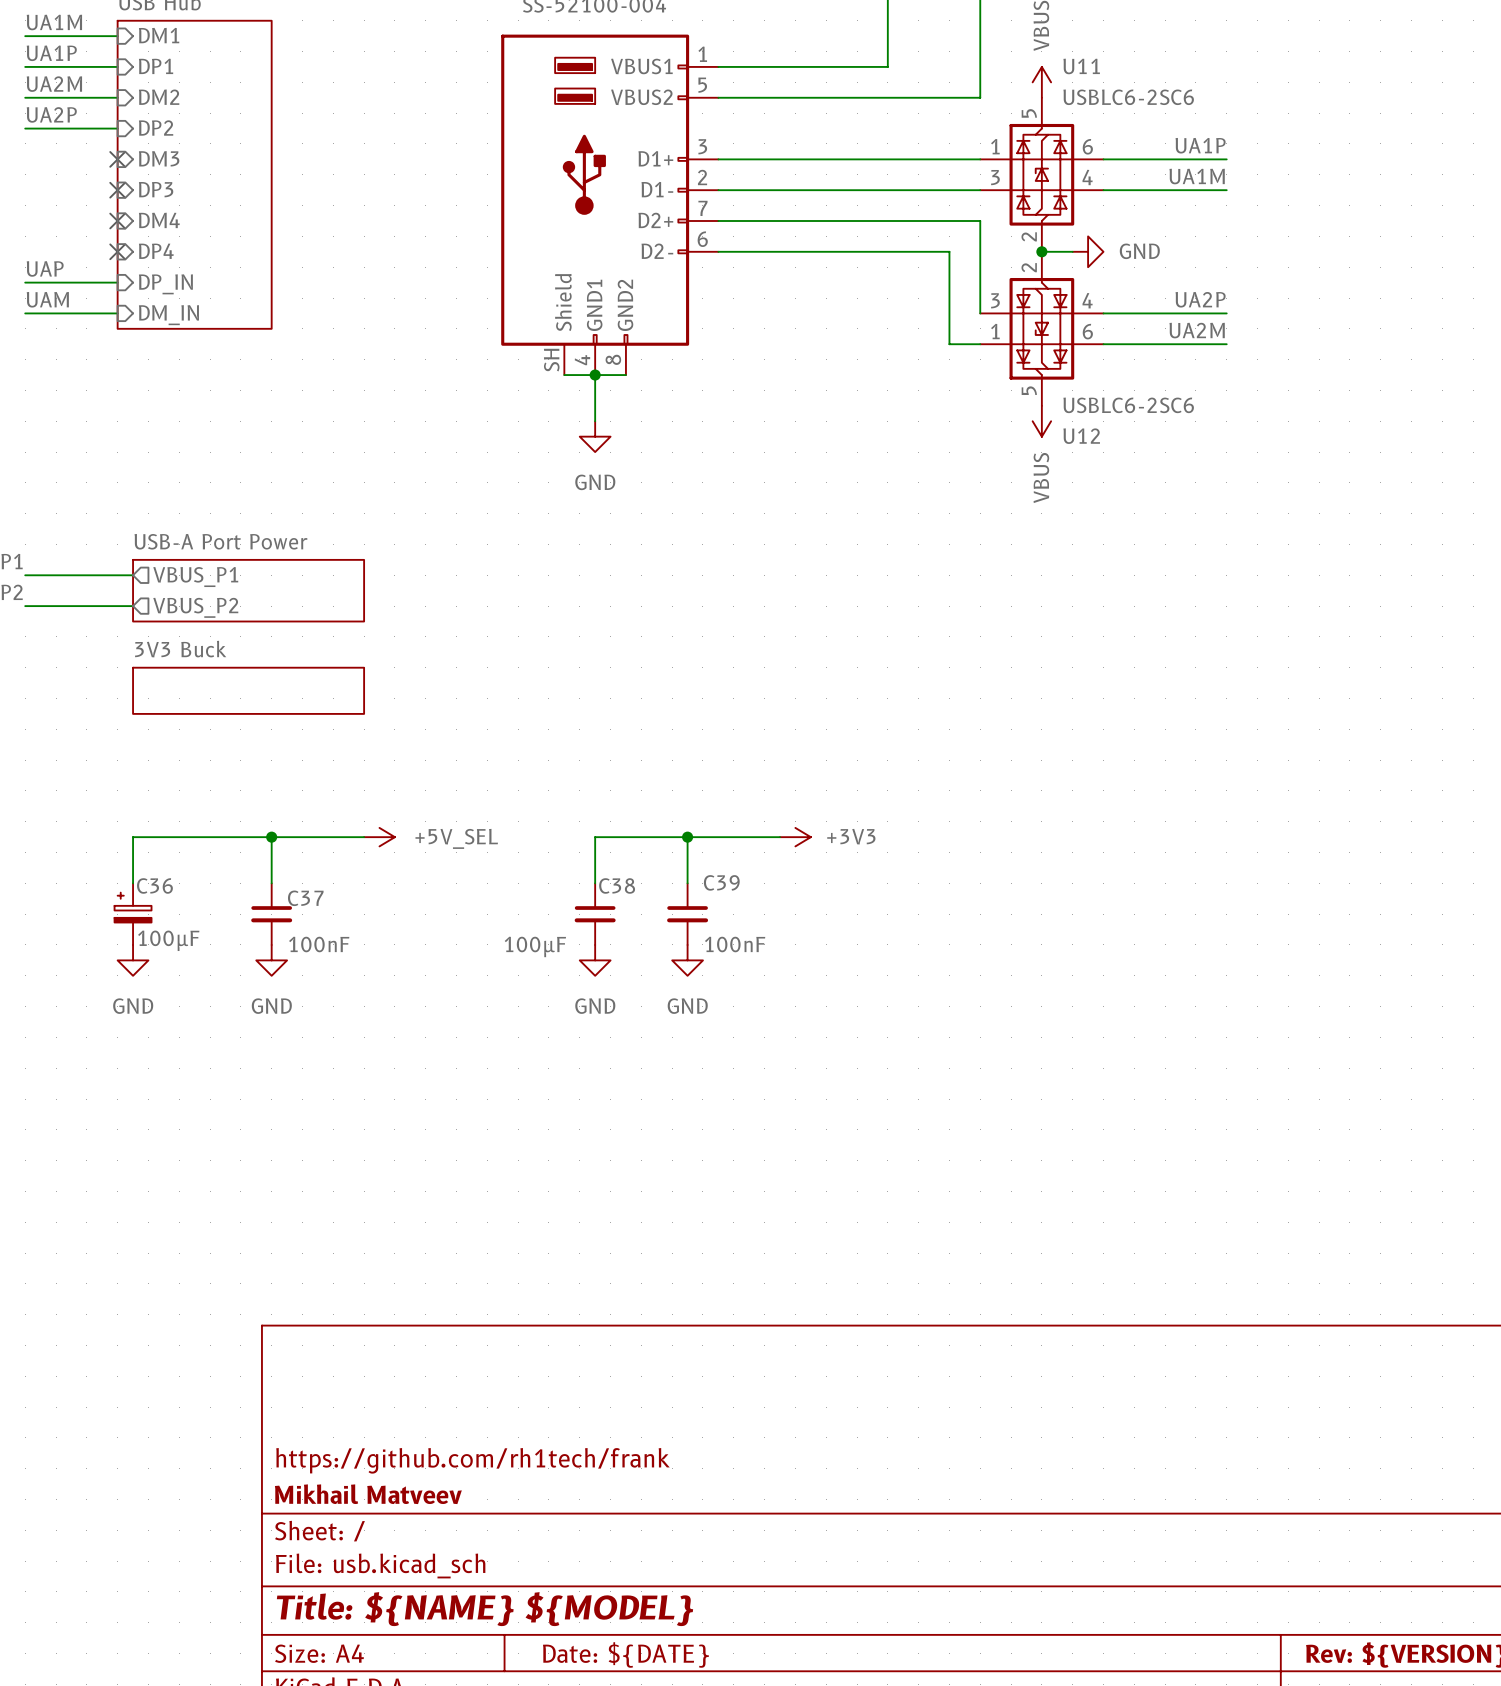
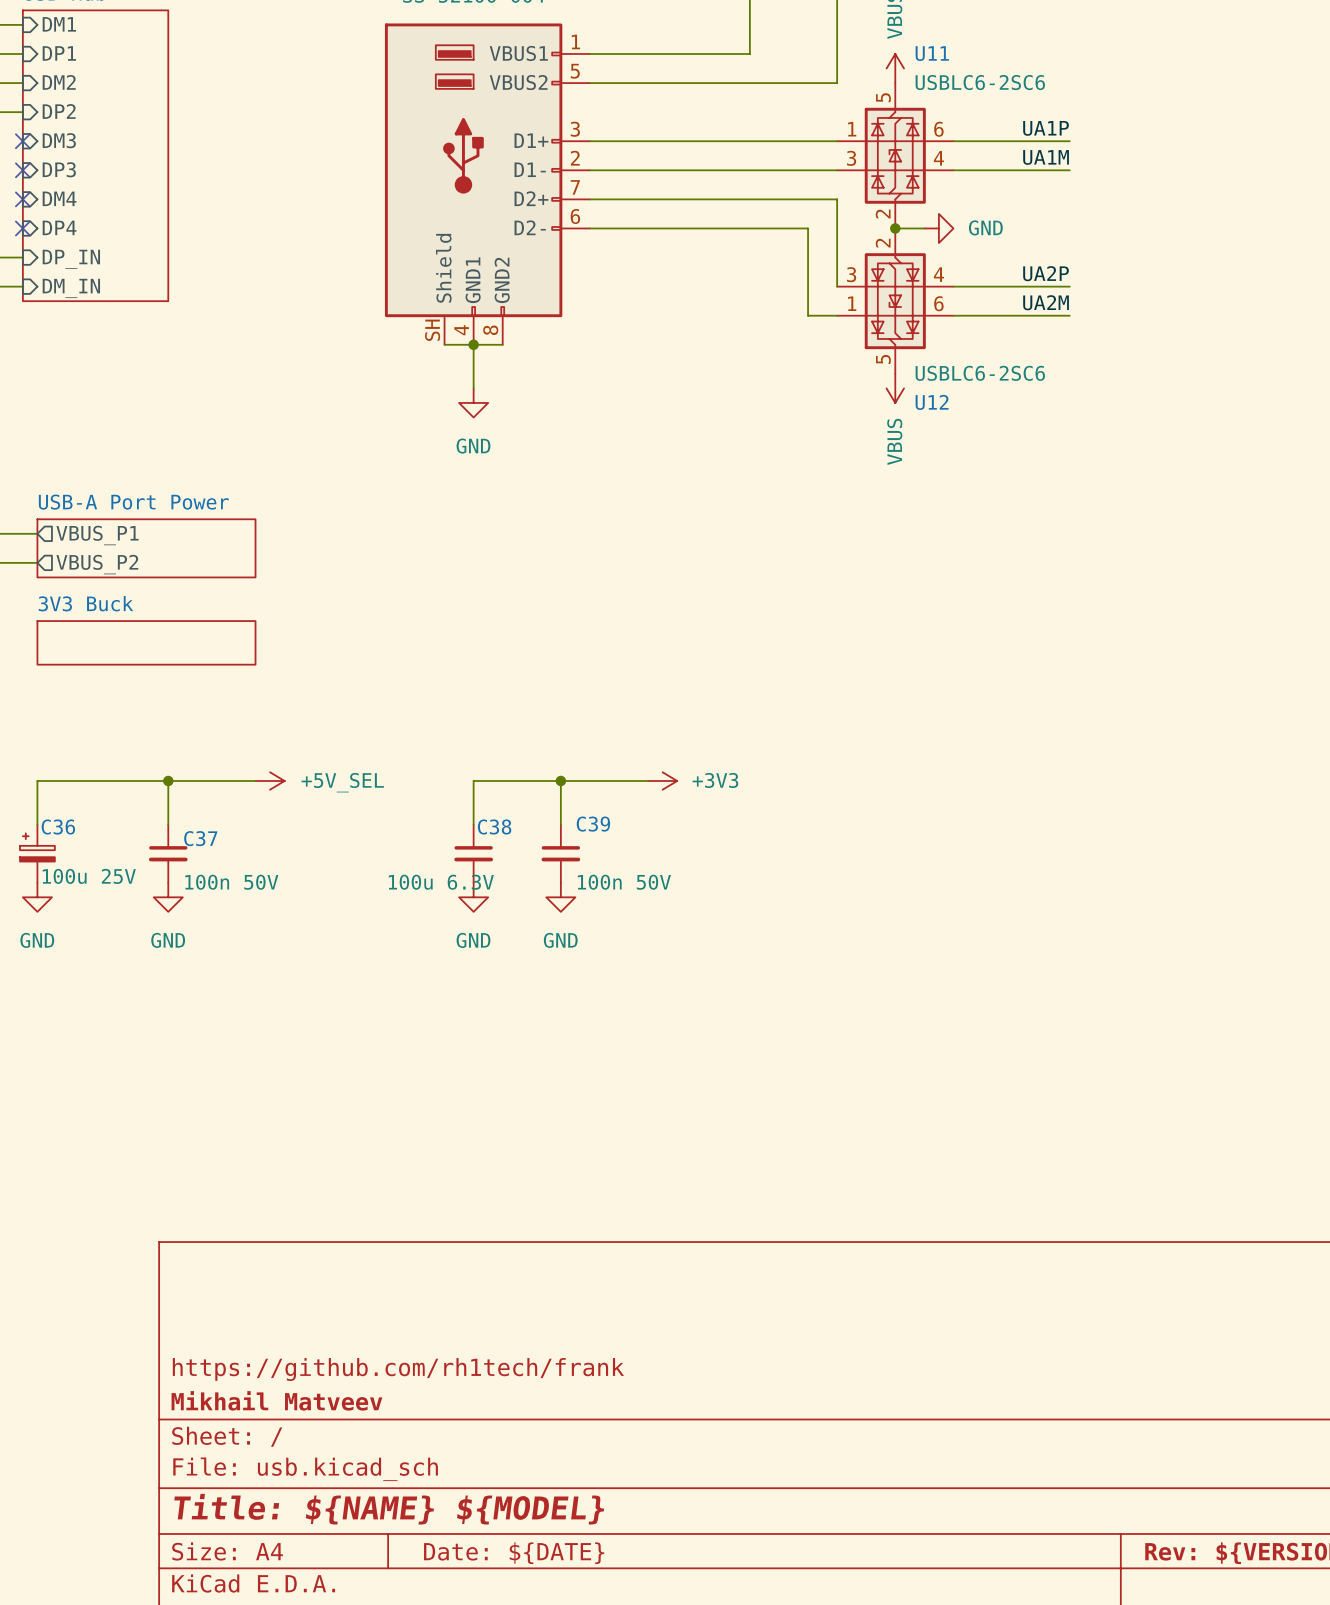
C36 value: 100µF (168, 940) -> 100u 25V (89, 876)
C37 value: 100nF (319, 944) -> 100n 50V (231, 882)
C39 value: 100nF (735, 944) -> 100n 50V (624, 882)
C38 value: 100µF (535, 946) -> 100u 6.3V (441, 882)

